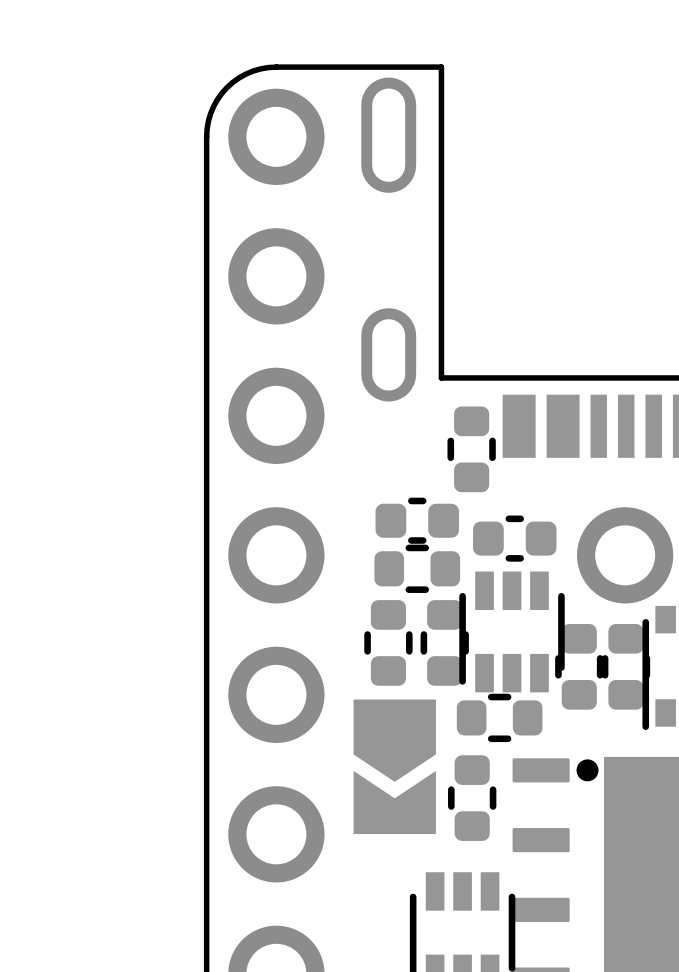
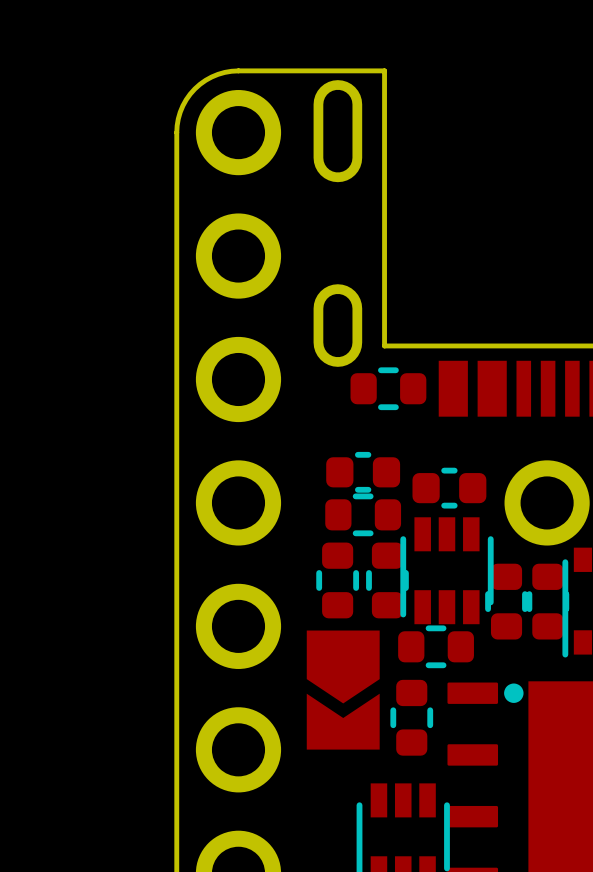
part rotation: 0° (471, 449) -> 90° clockwise (388, 388)

